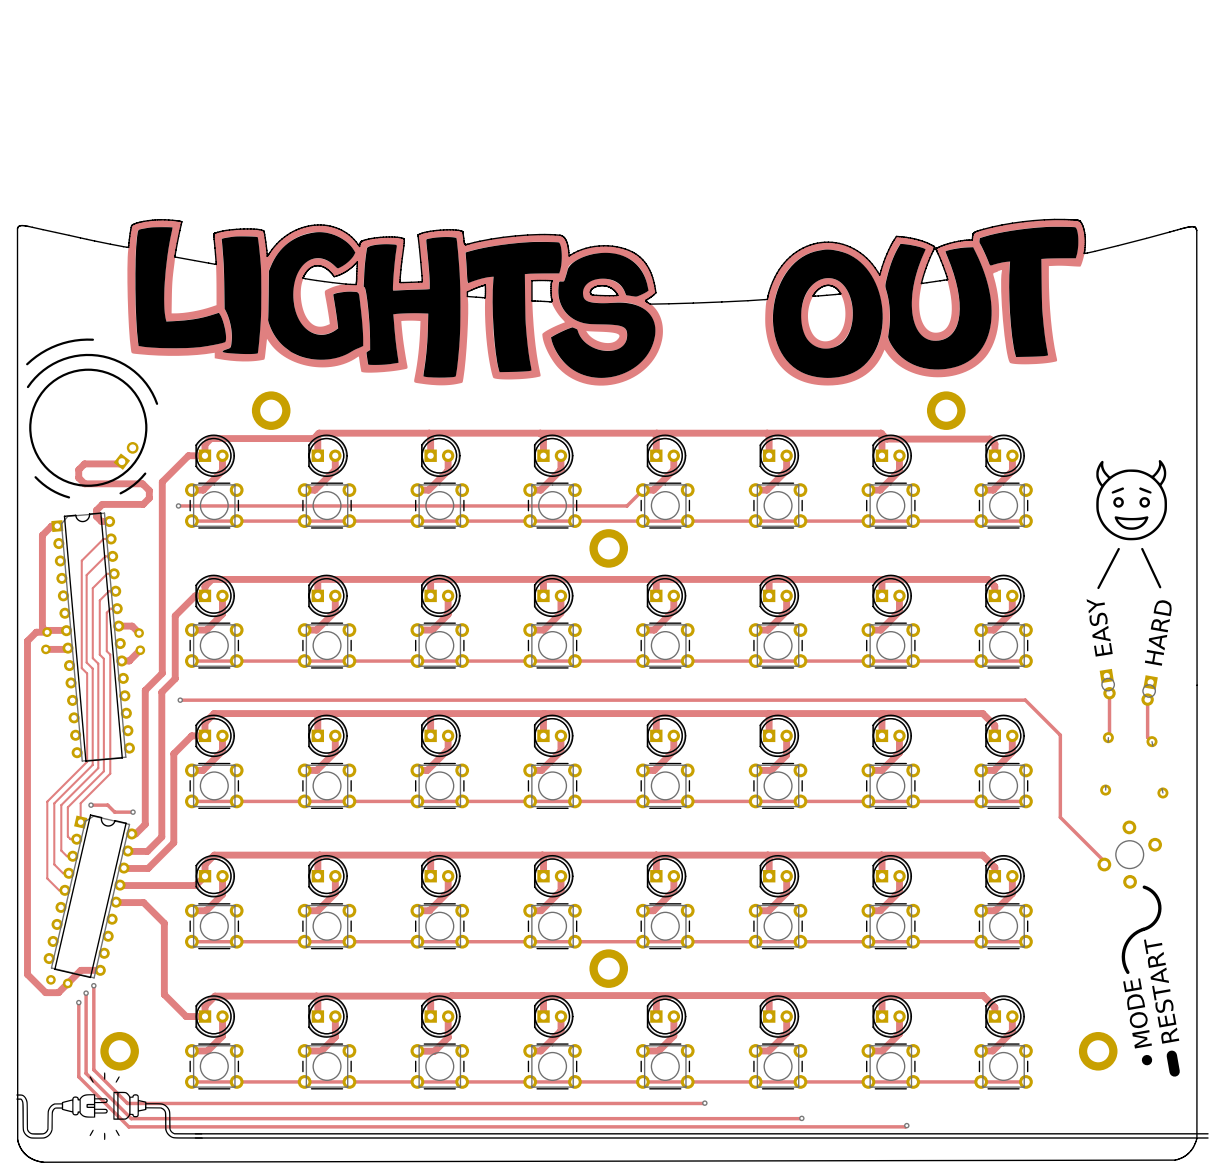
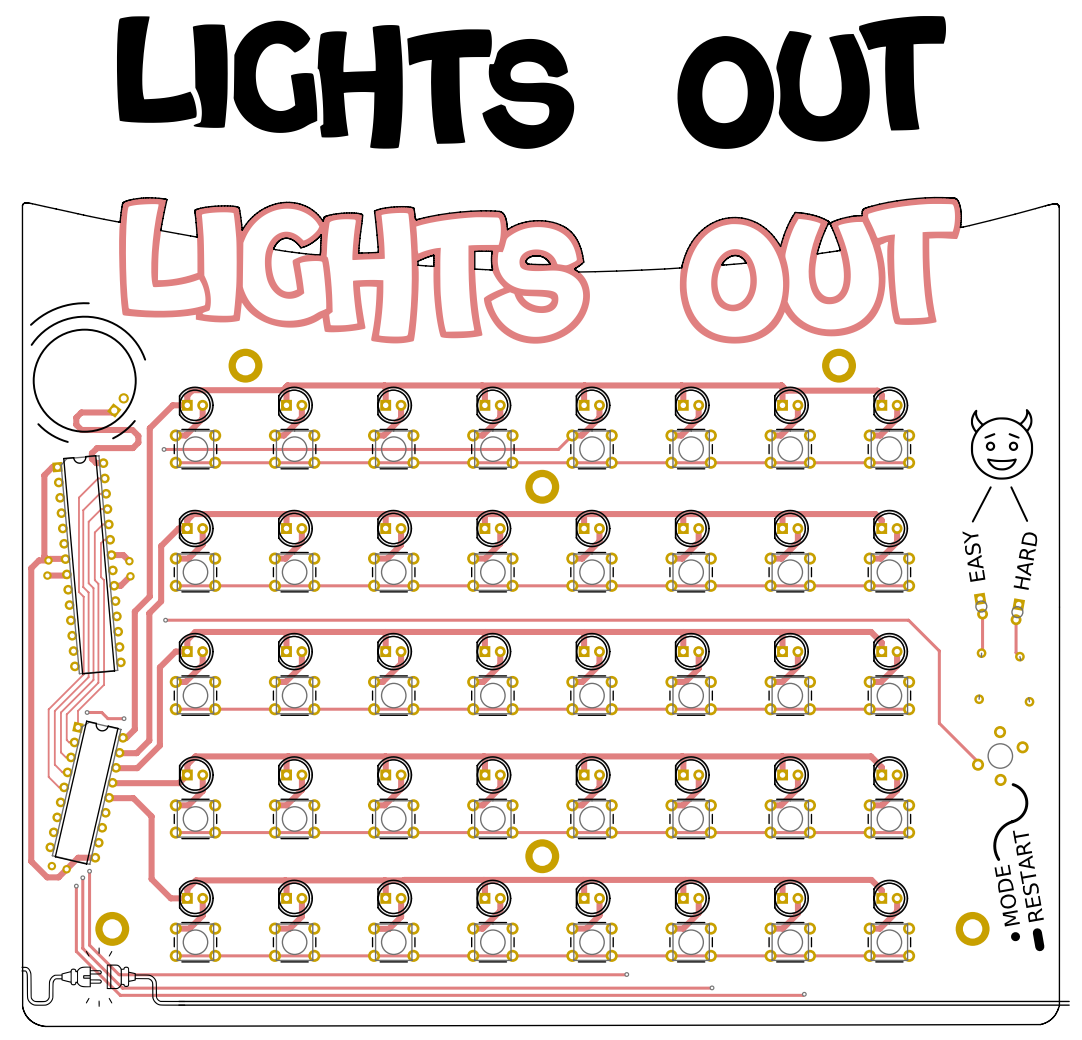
drawing: none -> [116, 16, 575, 149]
drawing: none -> [677, 16, 946, 149]
drawing: [772, 226, 1079, 378] -> none
drawing: [135, 227, 656, 378] -> none

